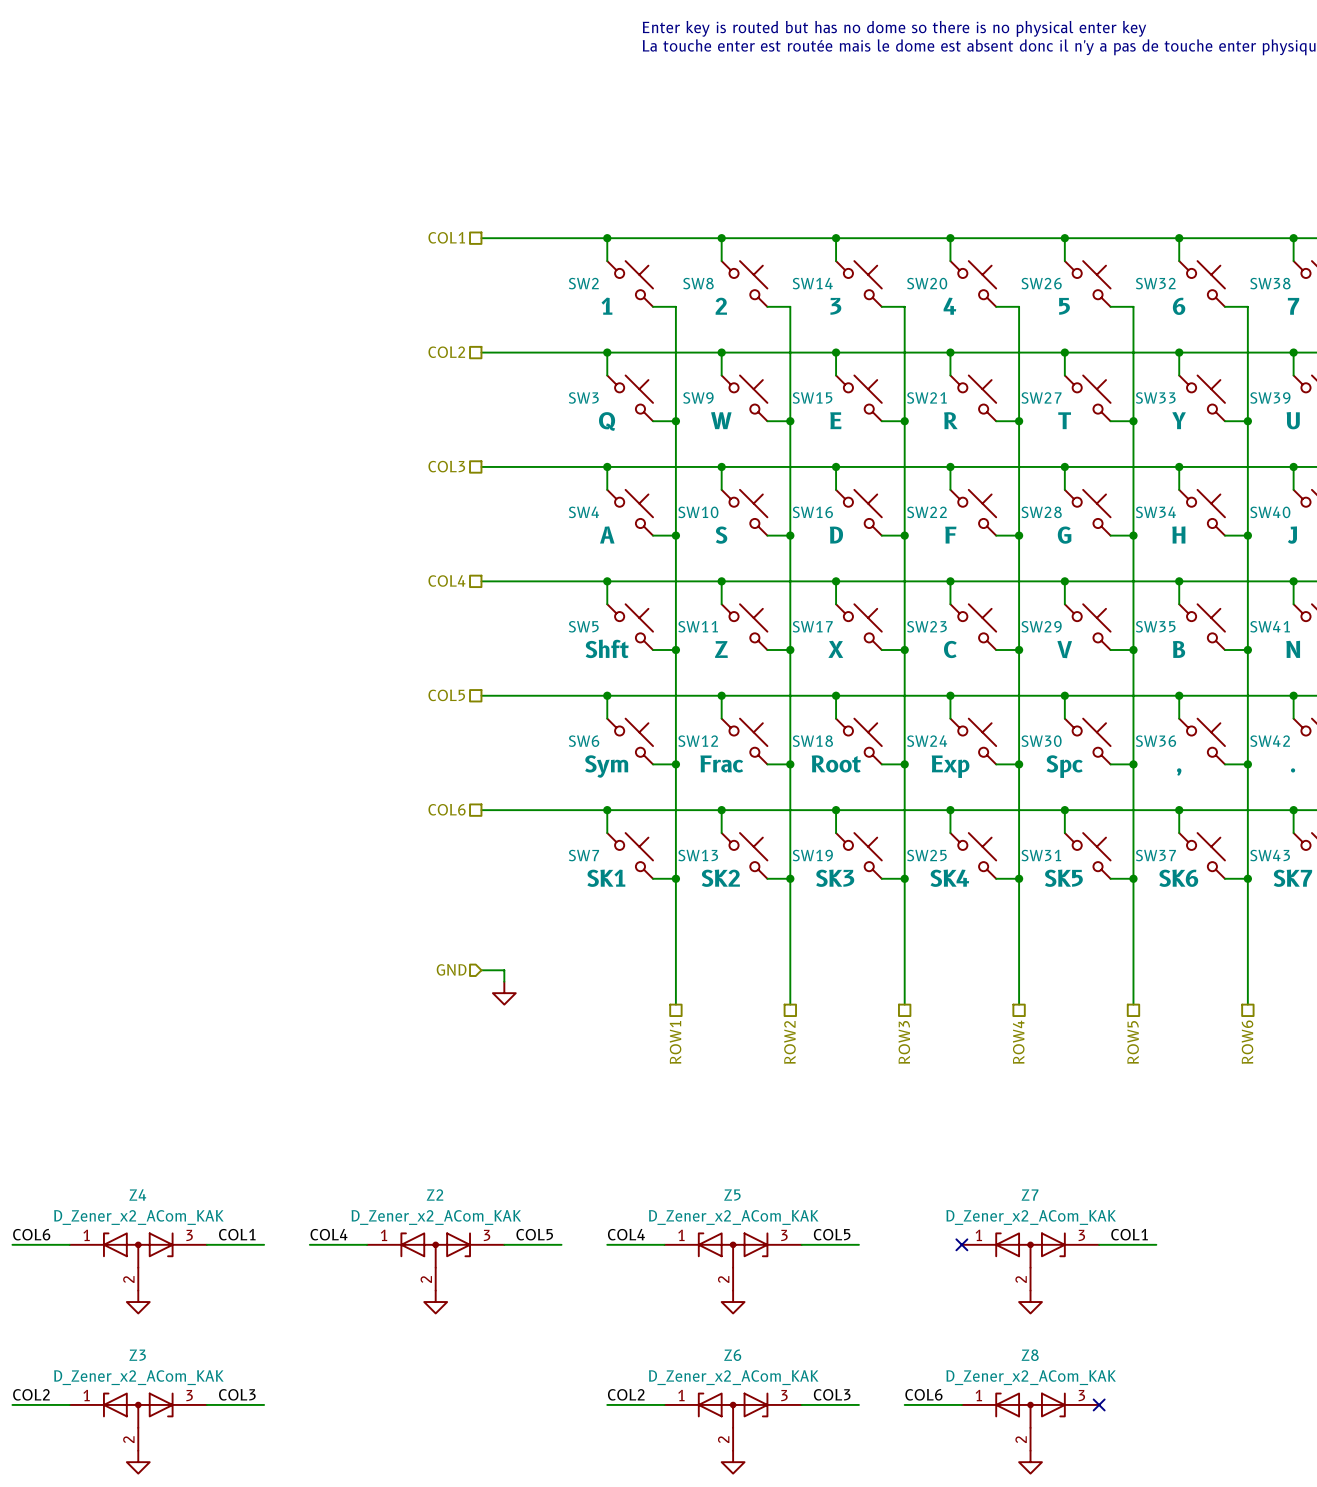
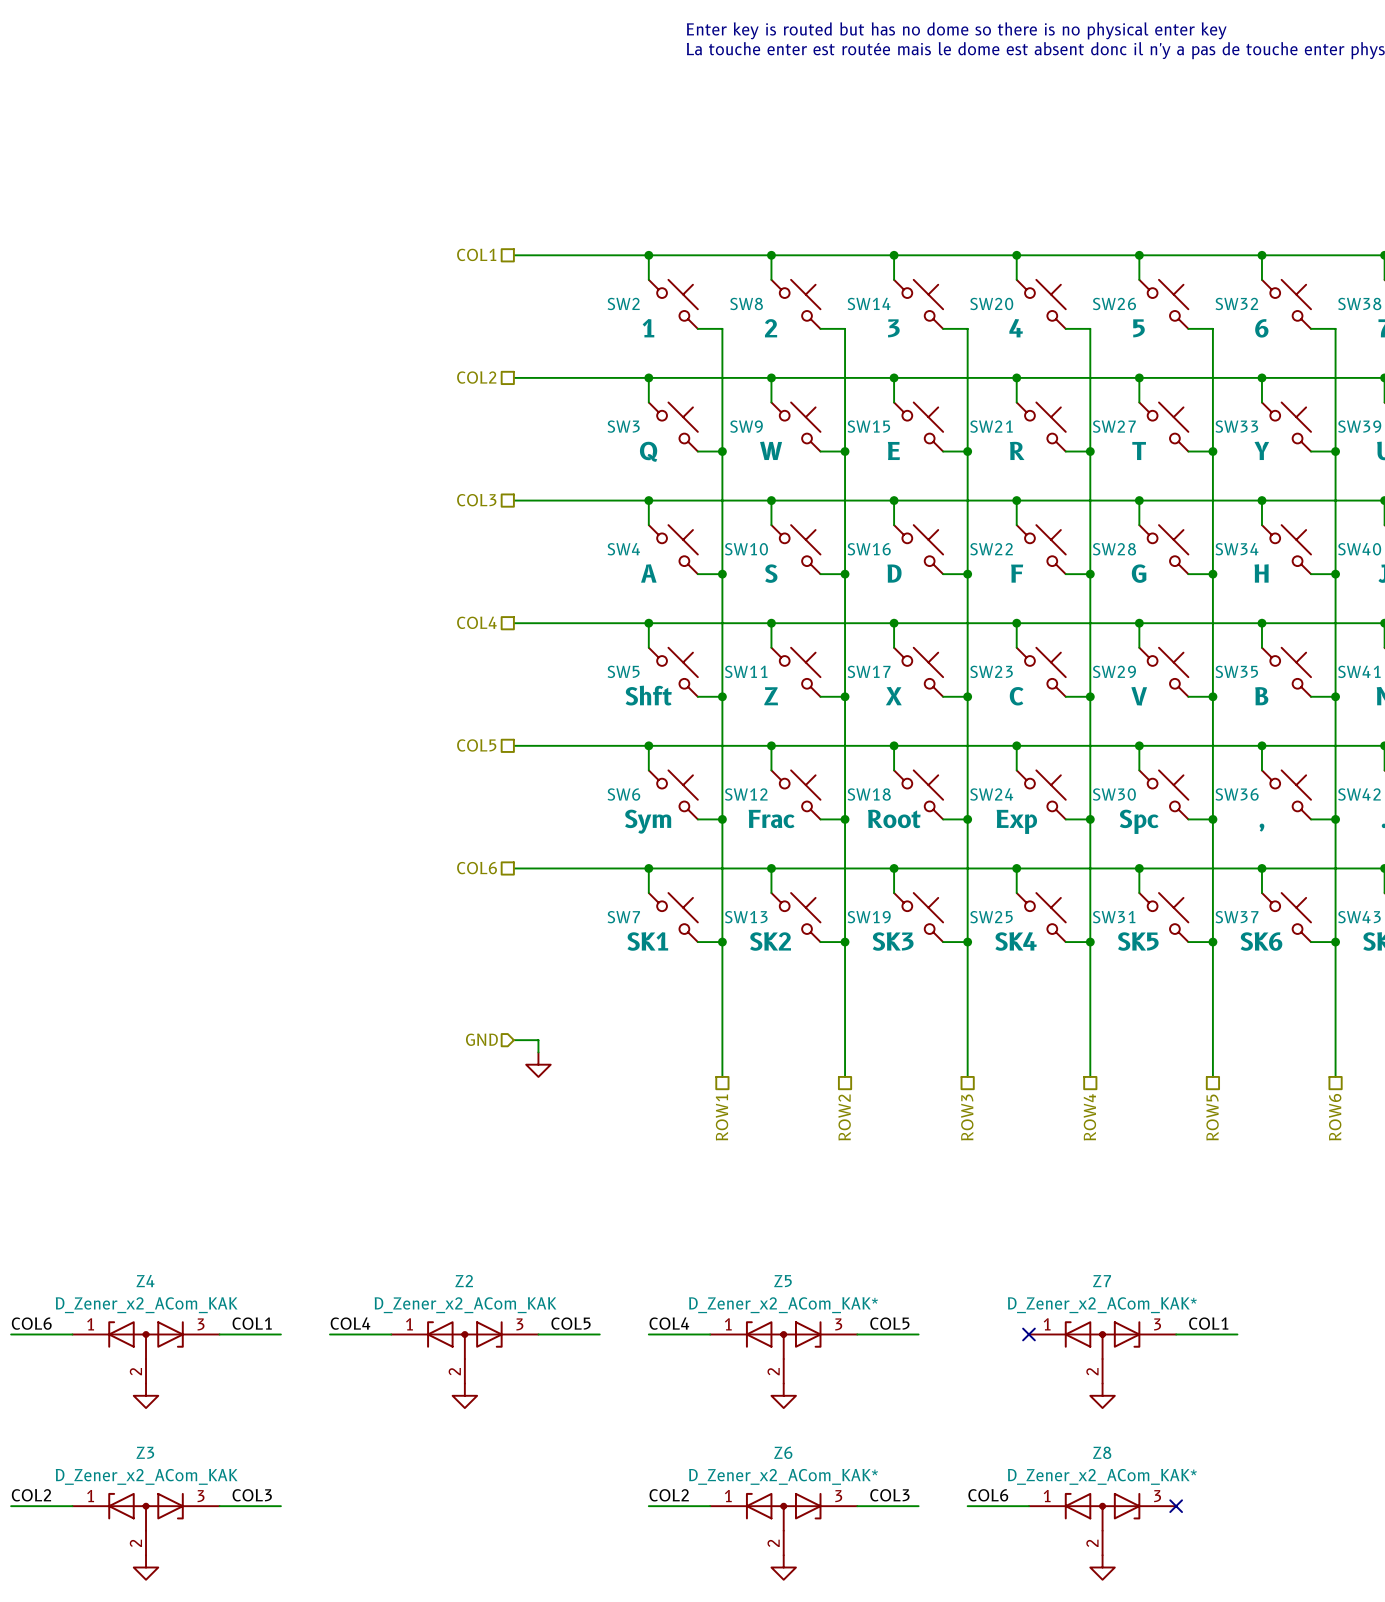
Z5 value: D_Zener_x2_ACom_KAK (733, 1217) -> D_Zener_x2_ACom_KAK* (783, 1305)
Z7 value: D_Zener_x2_ACom_KAK (1031, 1217) -> D_Zener_x2_ACom_KAK* (1102, 1305)
Z6 value: D_Zener_x2_ACom_KAK (733, 1377) -> D_Zener_x2_ACom_KAK* (783, 1476)
Z8 value: D_Zener_x2_ACom_KAK (1031, 1377) -> D_Zener_x2_ACom_KAK* (1102, 1476)

